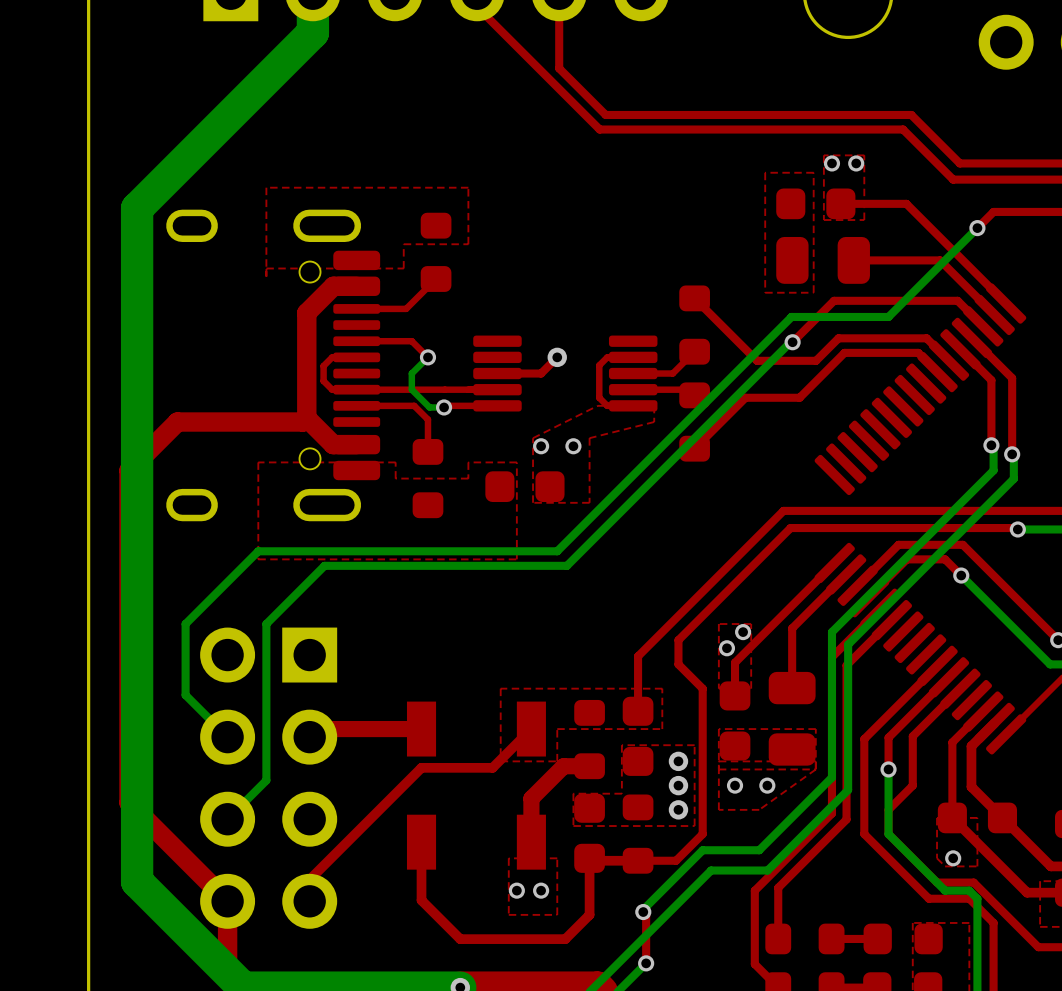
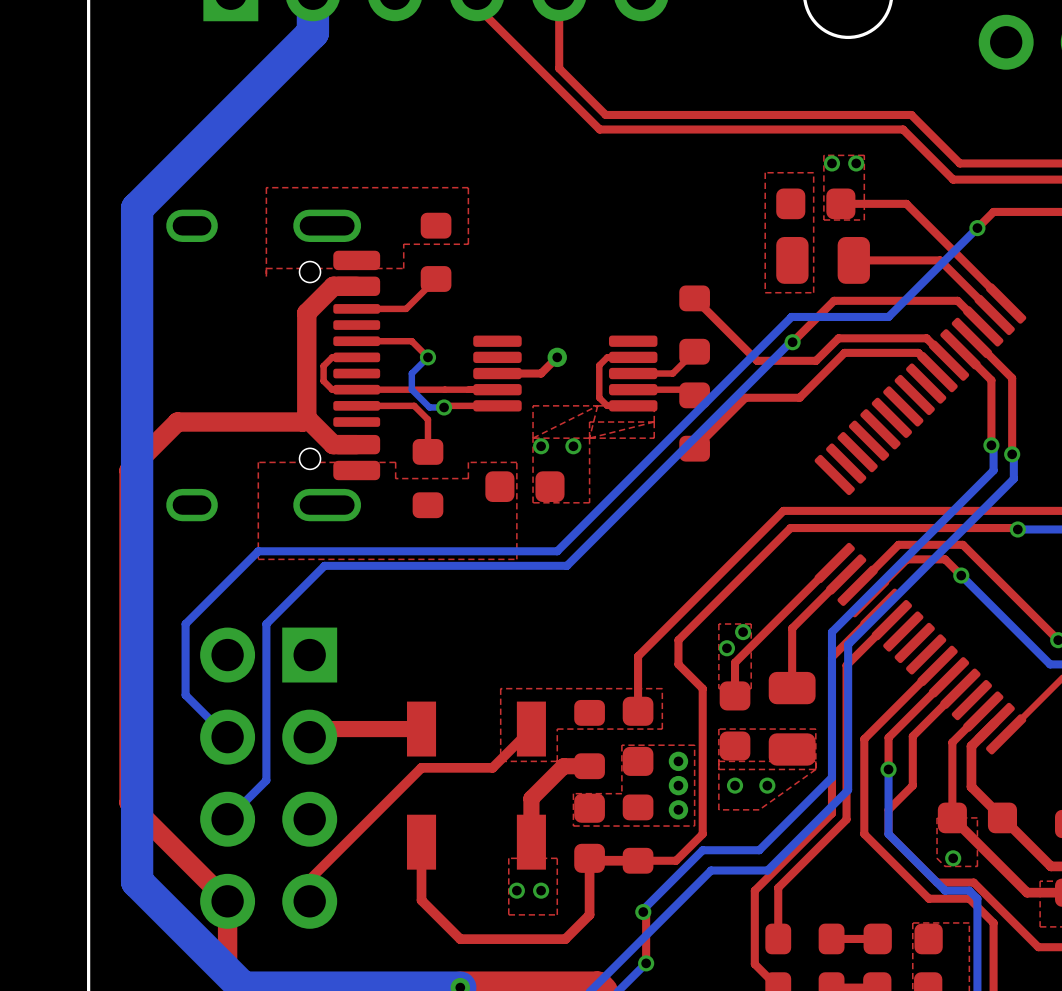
top zone outline: none -> (597, 405) (533, 405) (533, 438) (654, 438) (654, 422) (589, 422) (589, 438) (597, 405)

